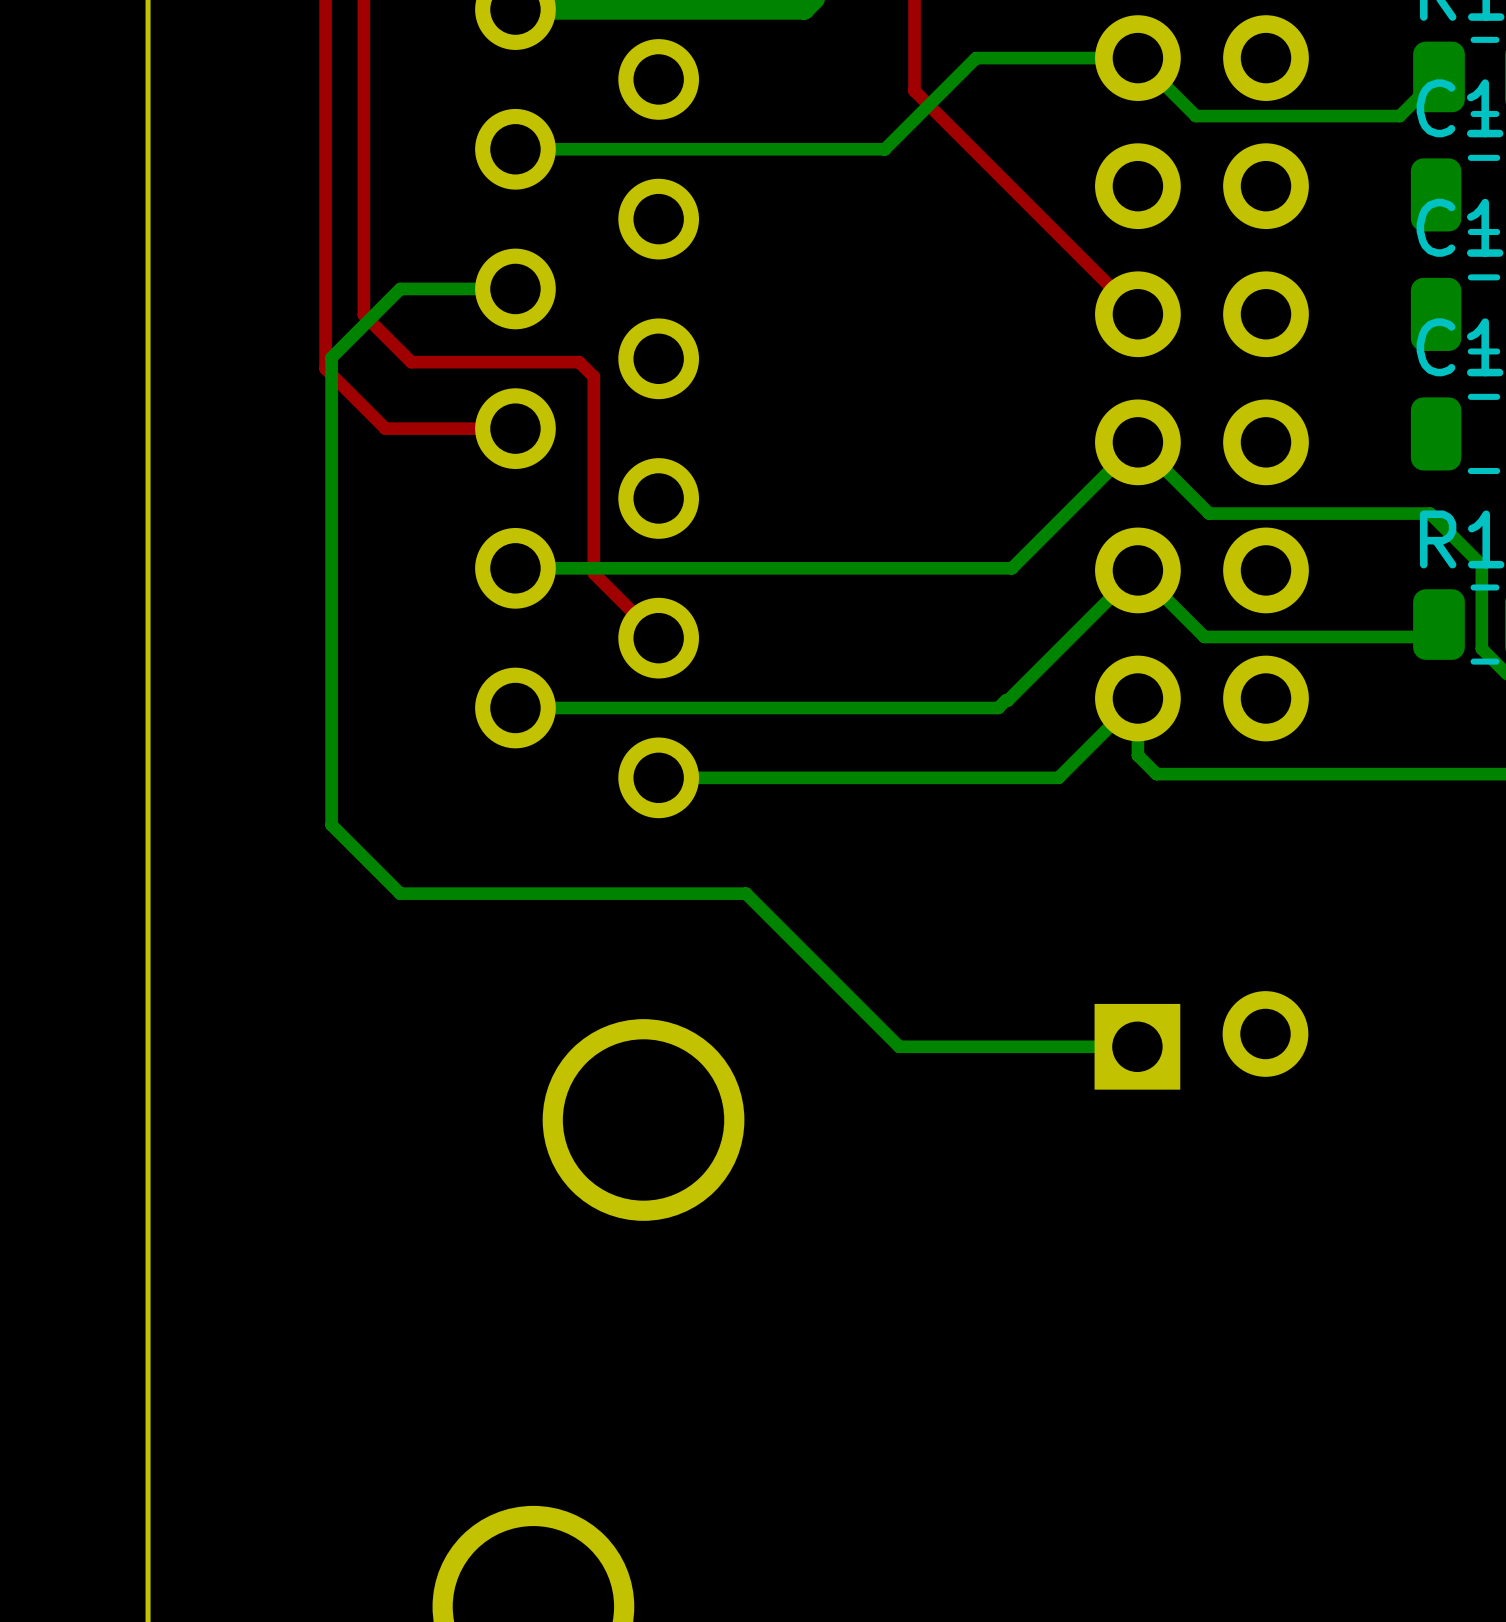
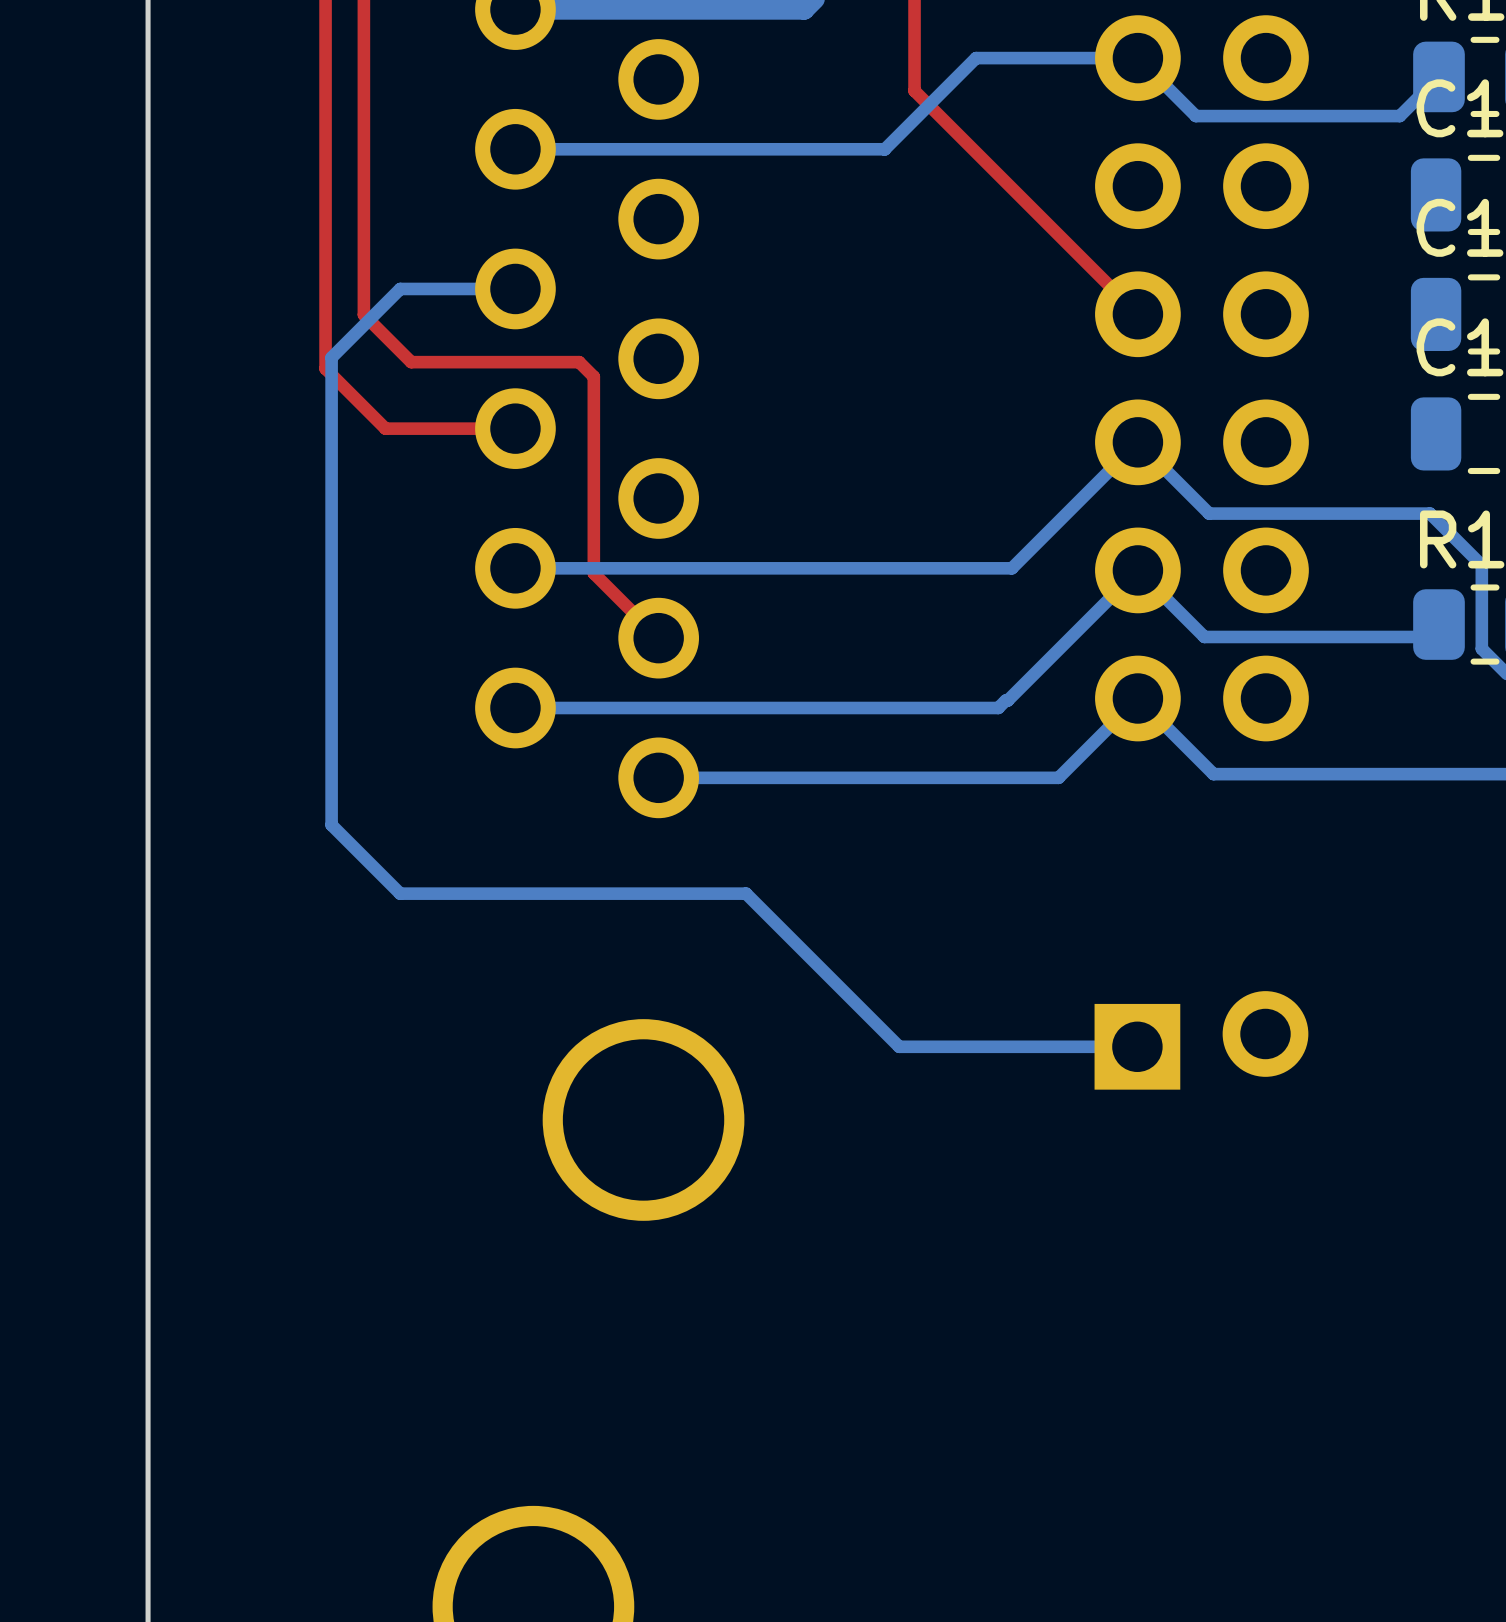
bottom track: (1137, 698) (1137, 755) (1156, 774) (1213, 774) -> (1137, 698) (1213, 774)

